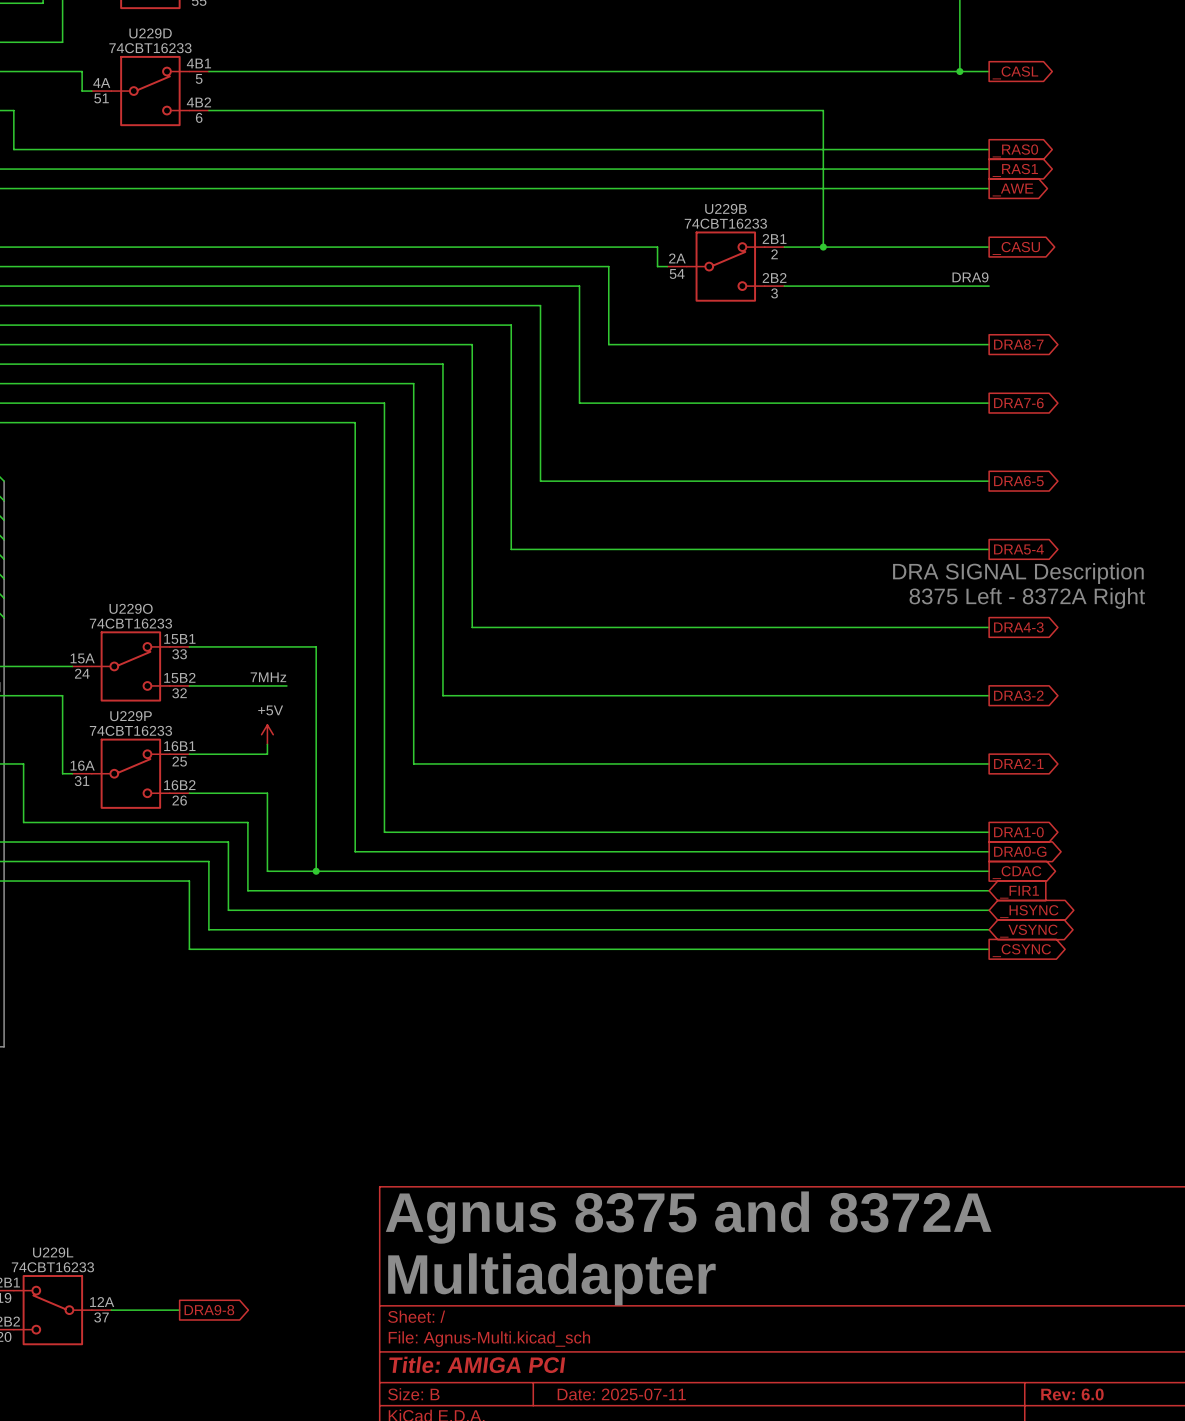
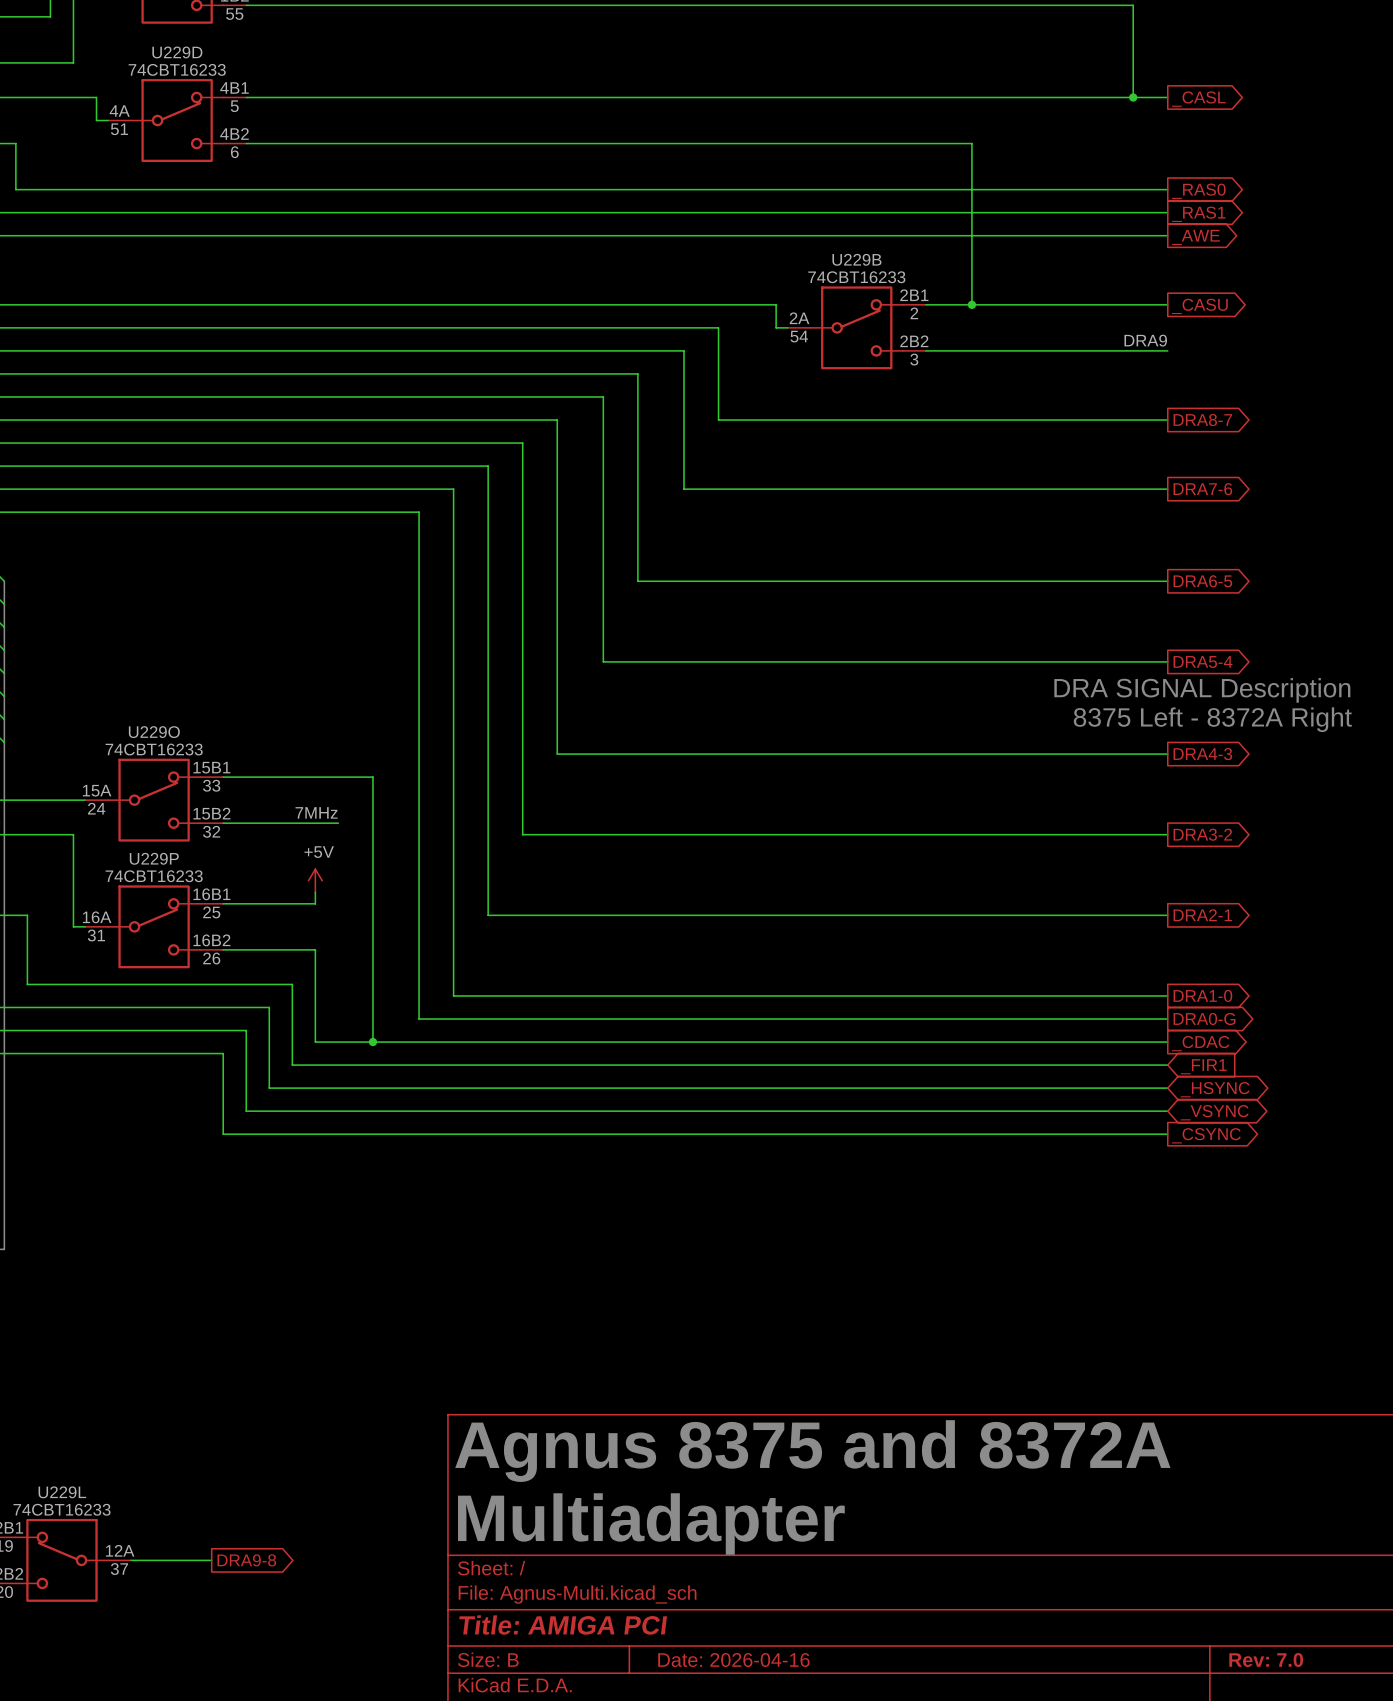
title block: Date: 2025-07-11 (621, 1394) -> Date: 2026-04-16 (733, 1660)
title block: Rev: 6.0 (1072, 1394) -> Rev: 7.0 (1266, 1660)

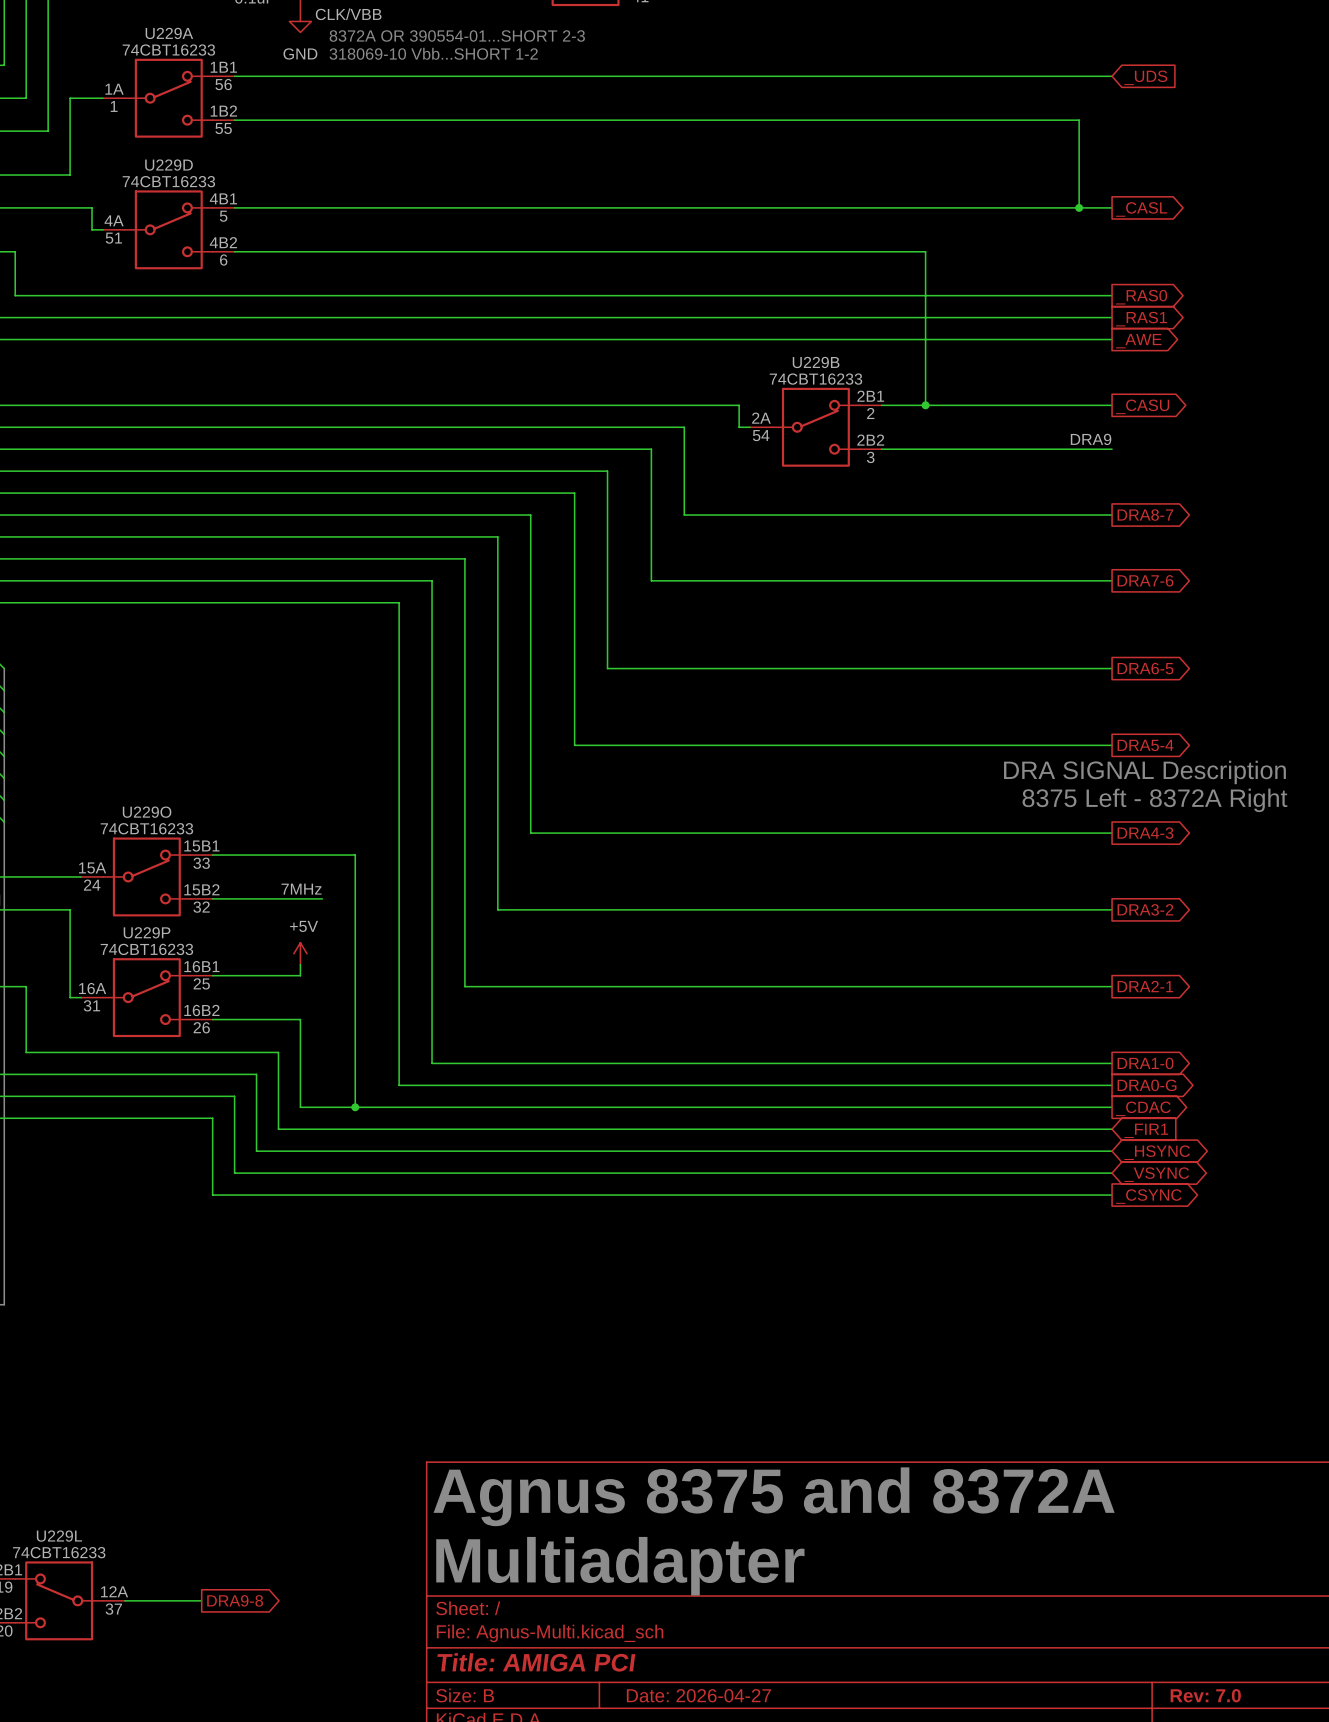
title block: Date: 2026-04-16 (733, 1660) -> Date: 2026-04-27 (698, 1695)

